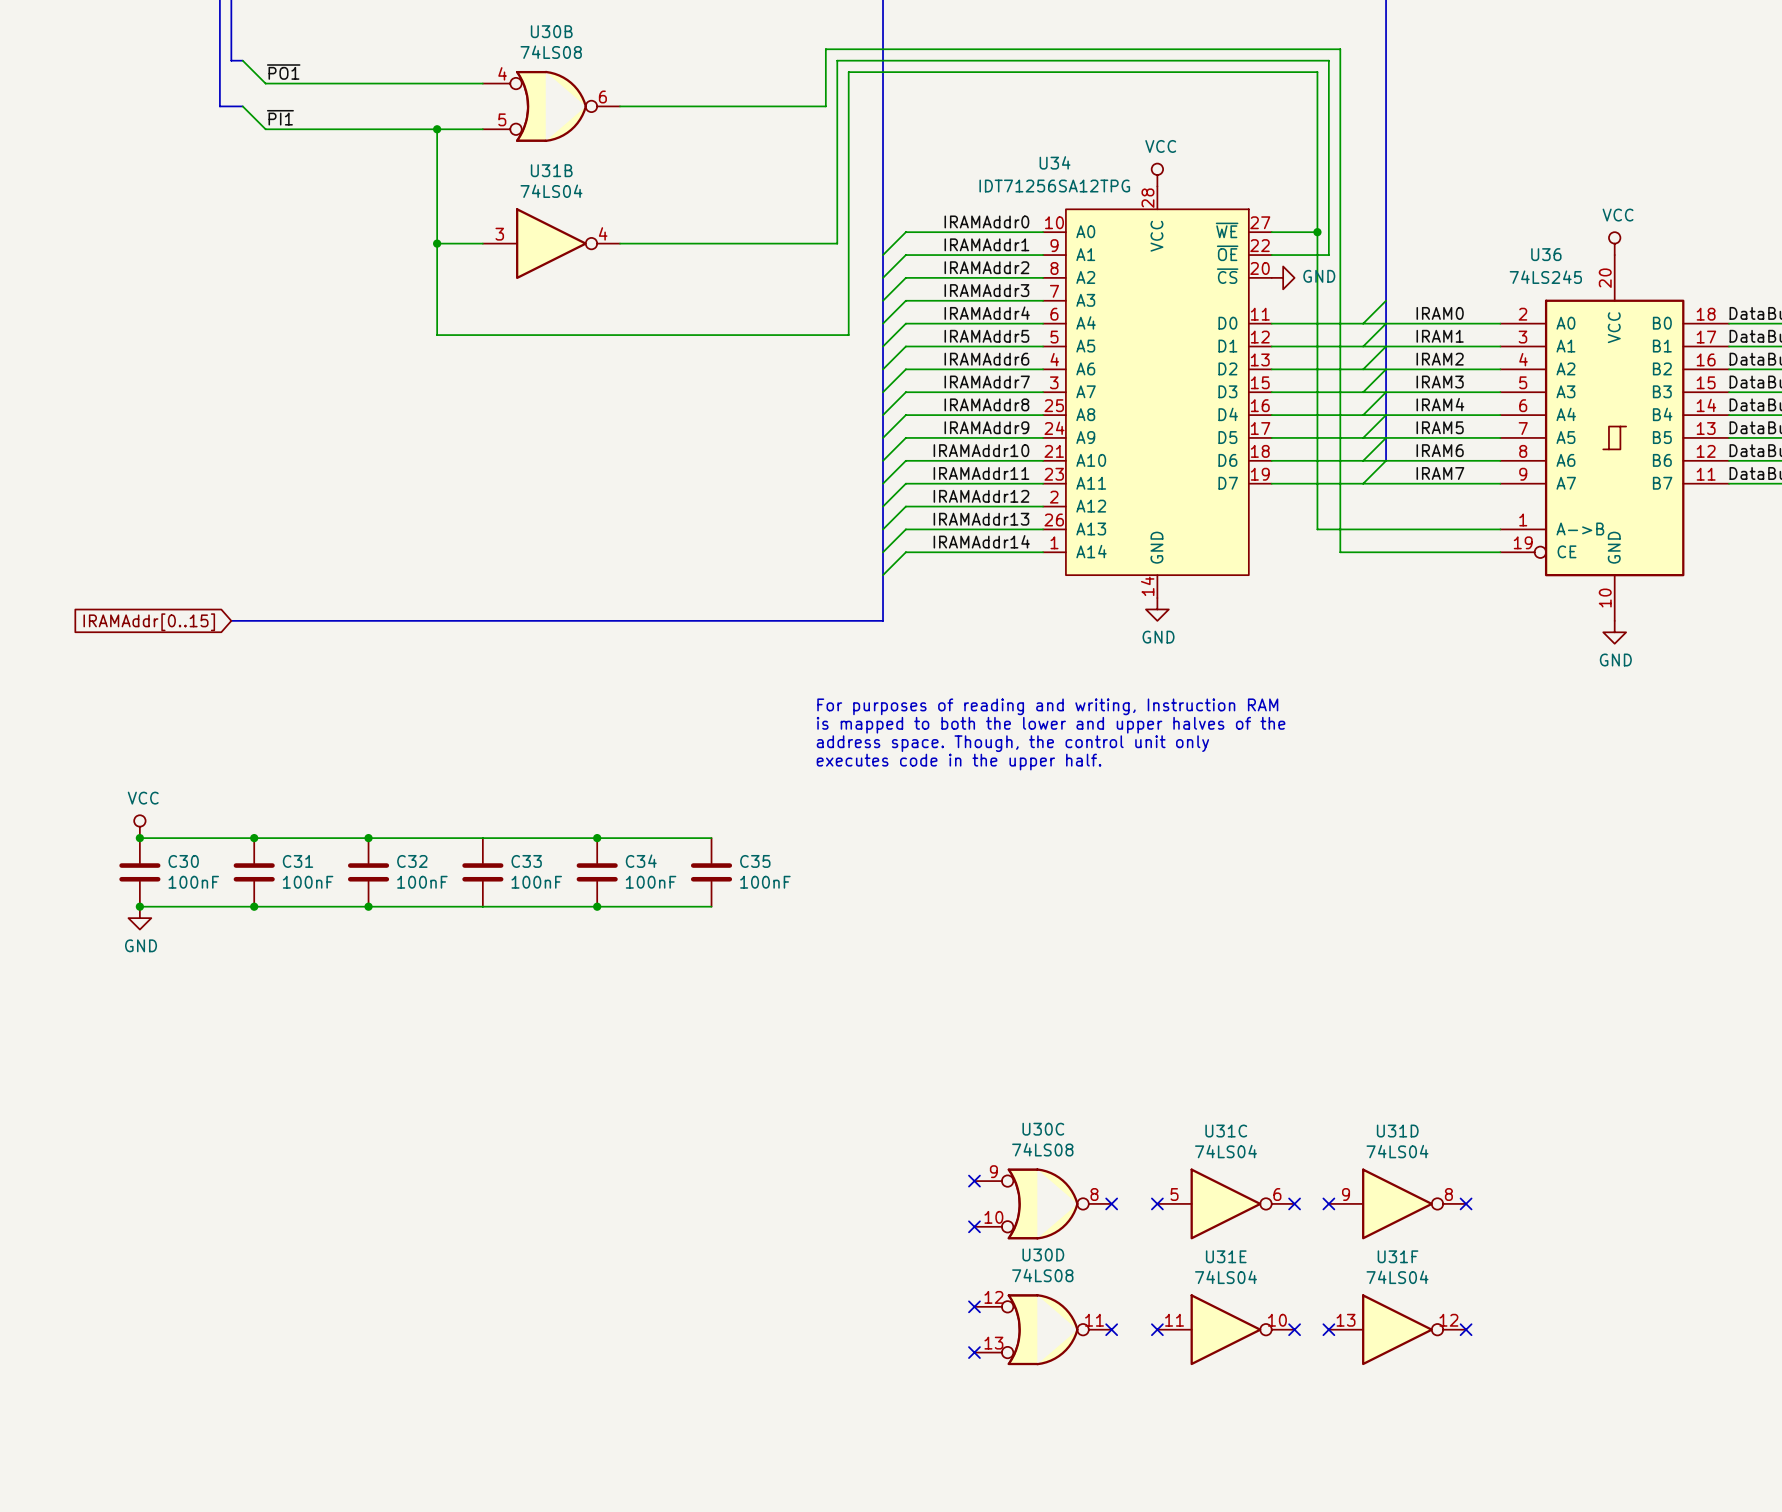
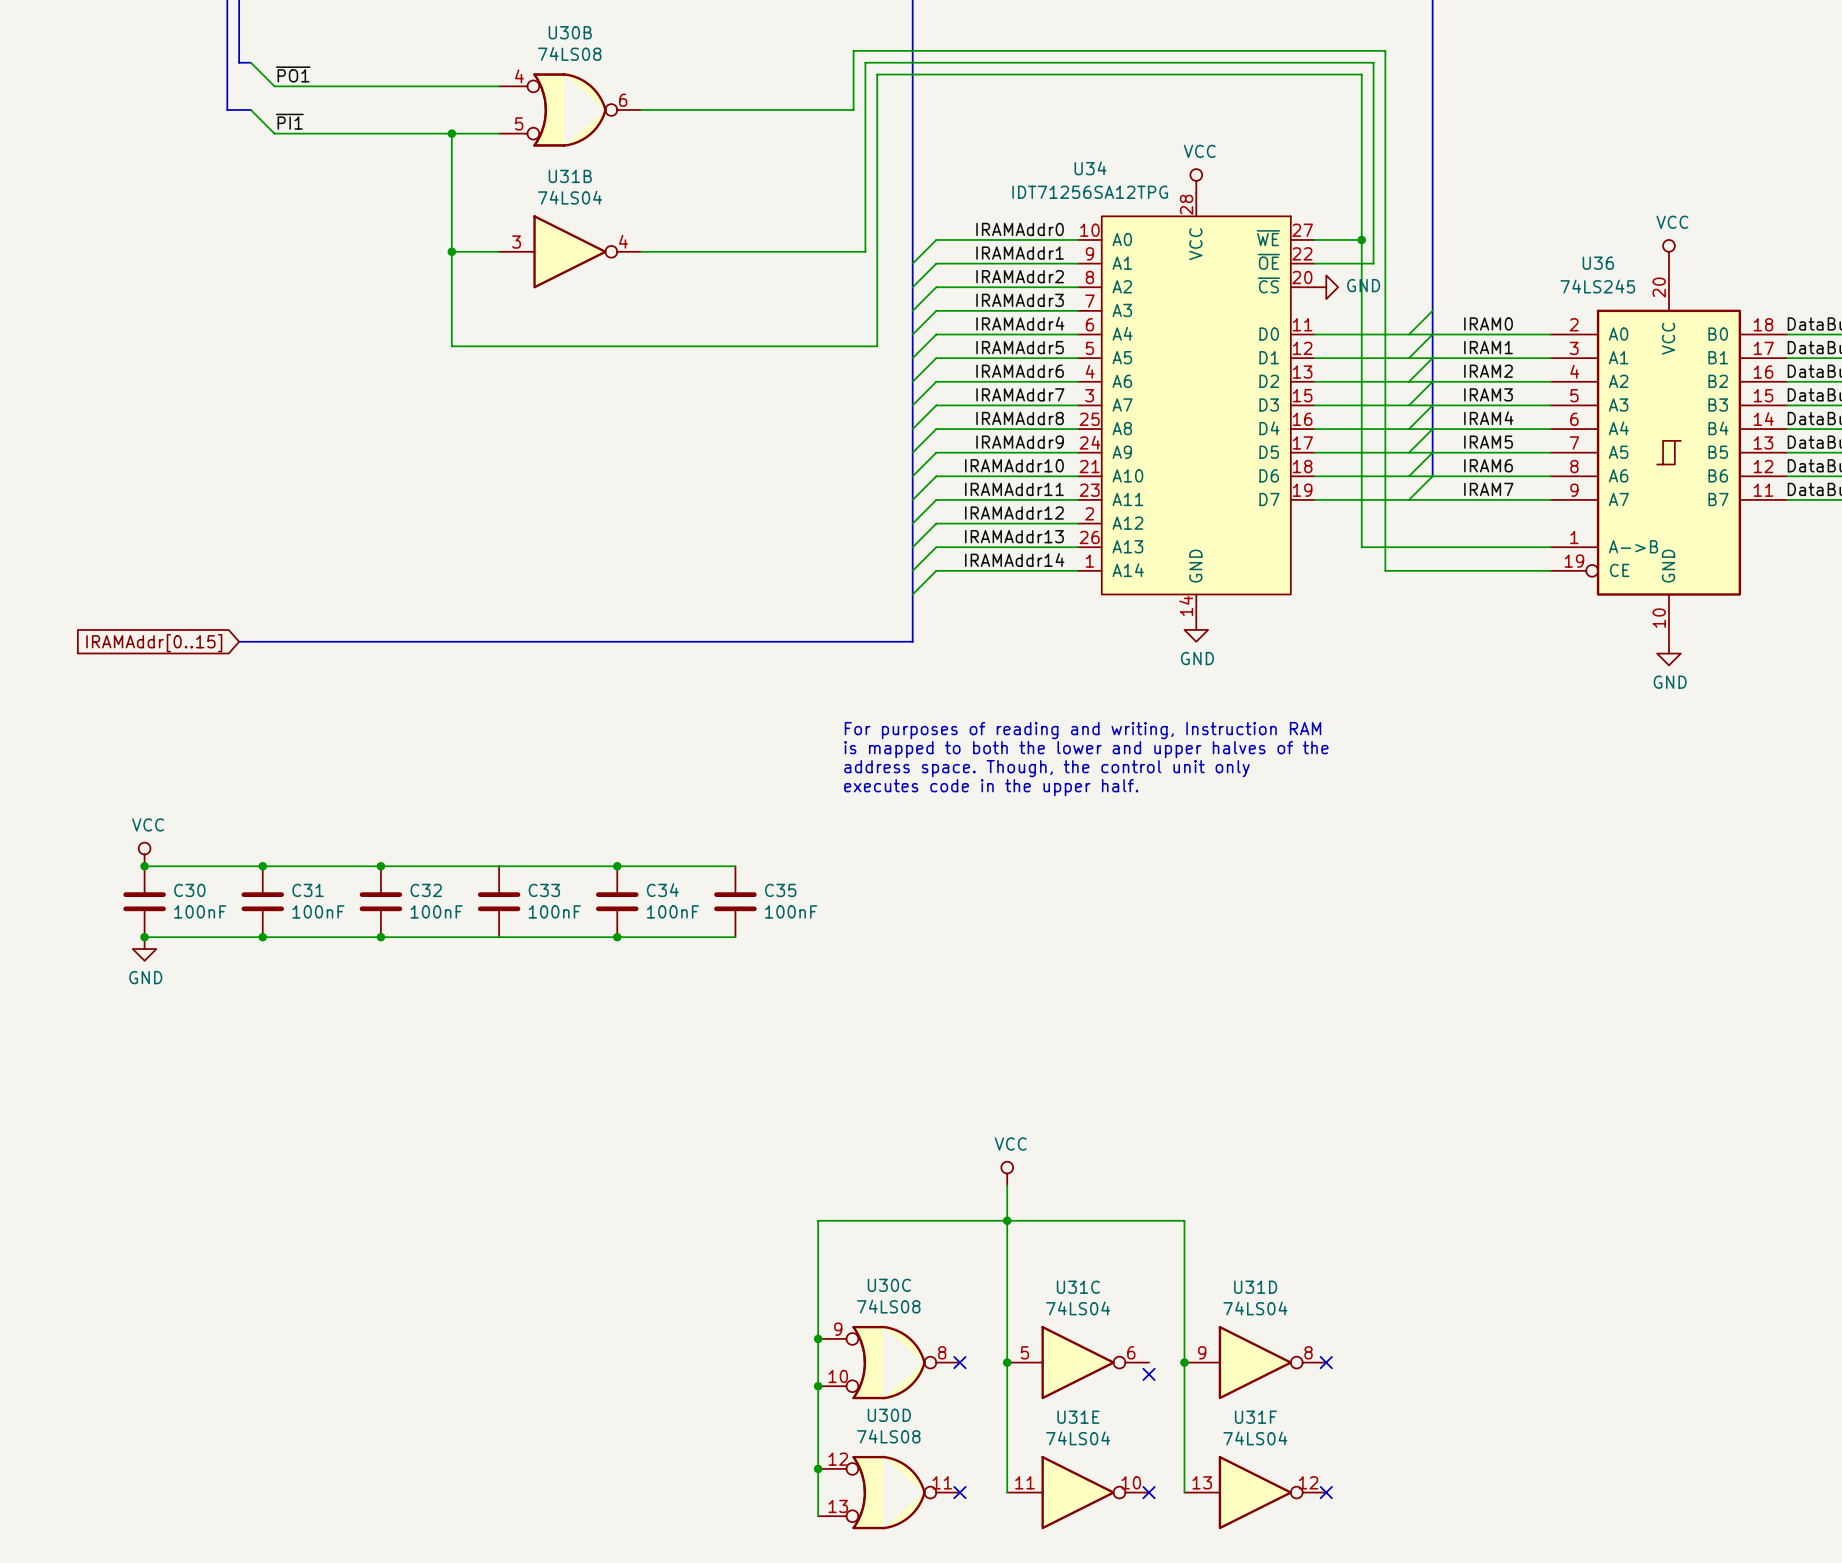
power symbol: none -> VCC (1007, 1173)
wire: none -> (1007, 1185) (1007, 1492)
no-connect mark: (974, 1181) -> none
junction: none -> (1007, 1220)
U30C position: (1043, 1203) -> (889, 1362)
no-connect mark: (1111, 1203) -> none
no-connect mark: (1157, 1203) -> none
U31C position: (1225, 1203) -> (1078, 1362)
no-connect mark: (1294, 1203) -> none
no-connect mark: (1328, 1203) -> none
U31D position: (1397, 1203) -> (1255, 1362)
no-connect mark: (1466, 1203) -> none
no-connect mark: (974, 1226) -> none
junction: none -> (818, 1338)
no-connect mark: (974, 1306) -> none
no-connect mark: none -> (959, 1362)
junction: none -> (1007, 1362)
junction: none -> (1184, 1362)
U30D position: (1043, 1329) -> (889, 1492)
no-connect mark: (1157, 1329) -> none
U31E position: (1225, 1329) -> (1078, 1492)
no-connect mark position: (1294, 1329) -> (1326, 1362)
no-connect mark: (1328, 1329) -> none
U31F position: (1397, 1329) -> (1255, 1492)
no-connect mark: (1466, 1329) -> none
junction: none -> (818, 1386)
no-connect mark: (974, 1352) -> none
junction: none -> (818, 1468)
no-connect mark: none -> (959, 1492)
no-connect mark: none -> (1149, 1492)
wire: none -> (1184, 1492) (1184, 1220) (818, 1220) (818, 1516)
no-connect mark: none -> (1326, 1492)

